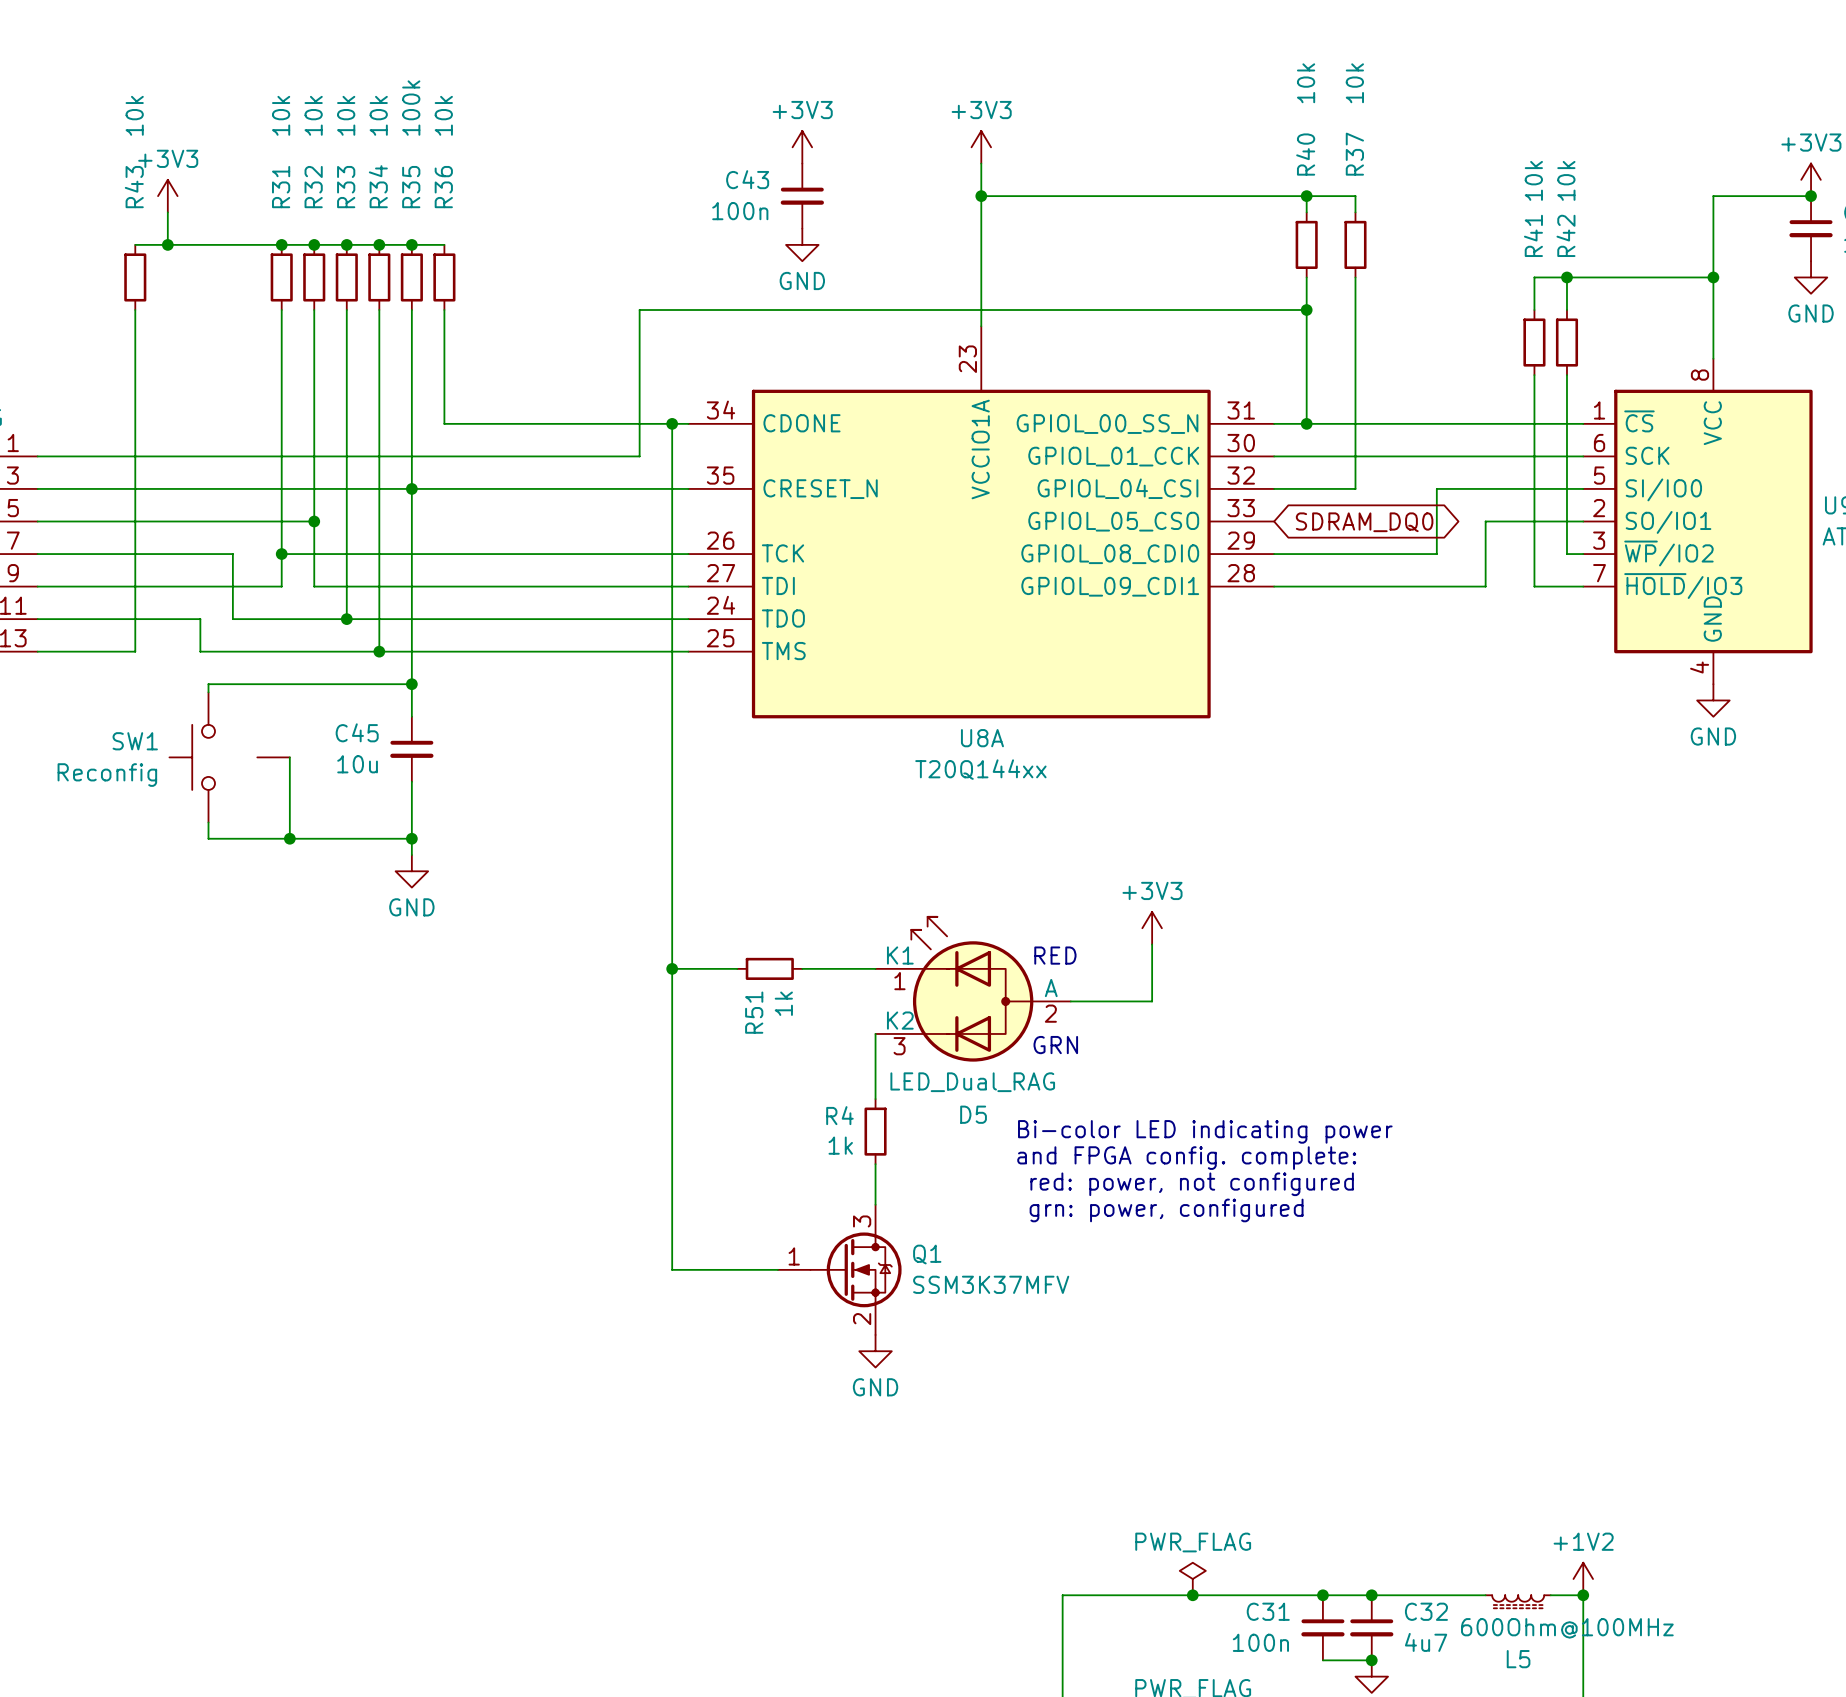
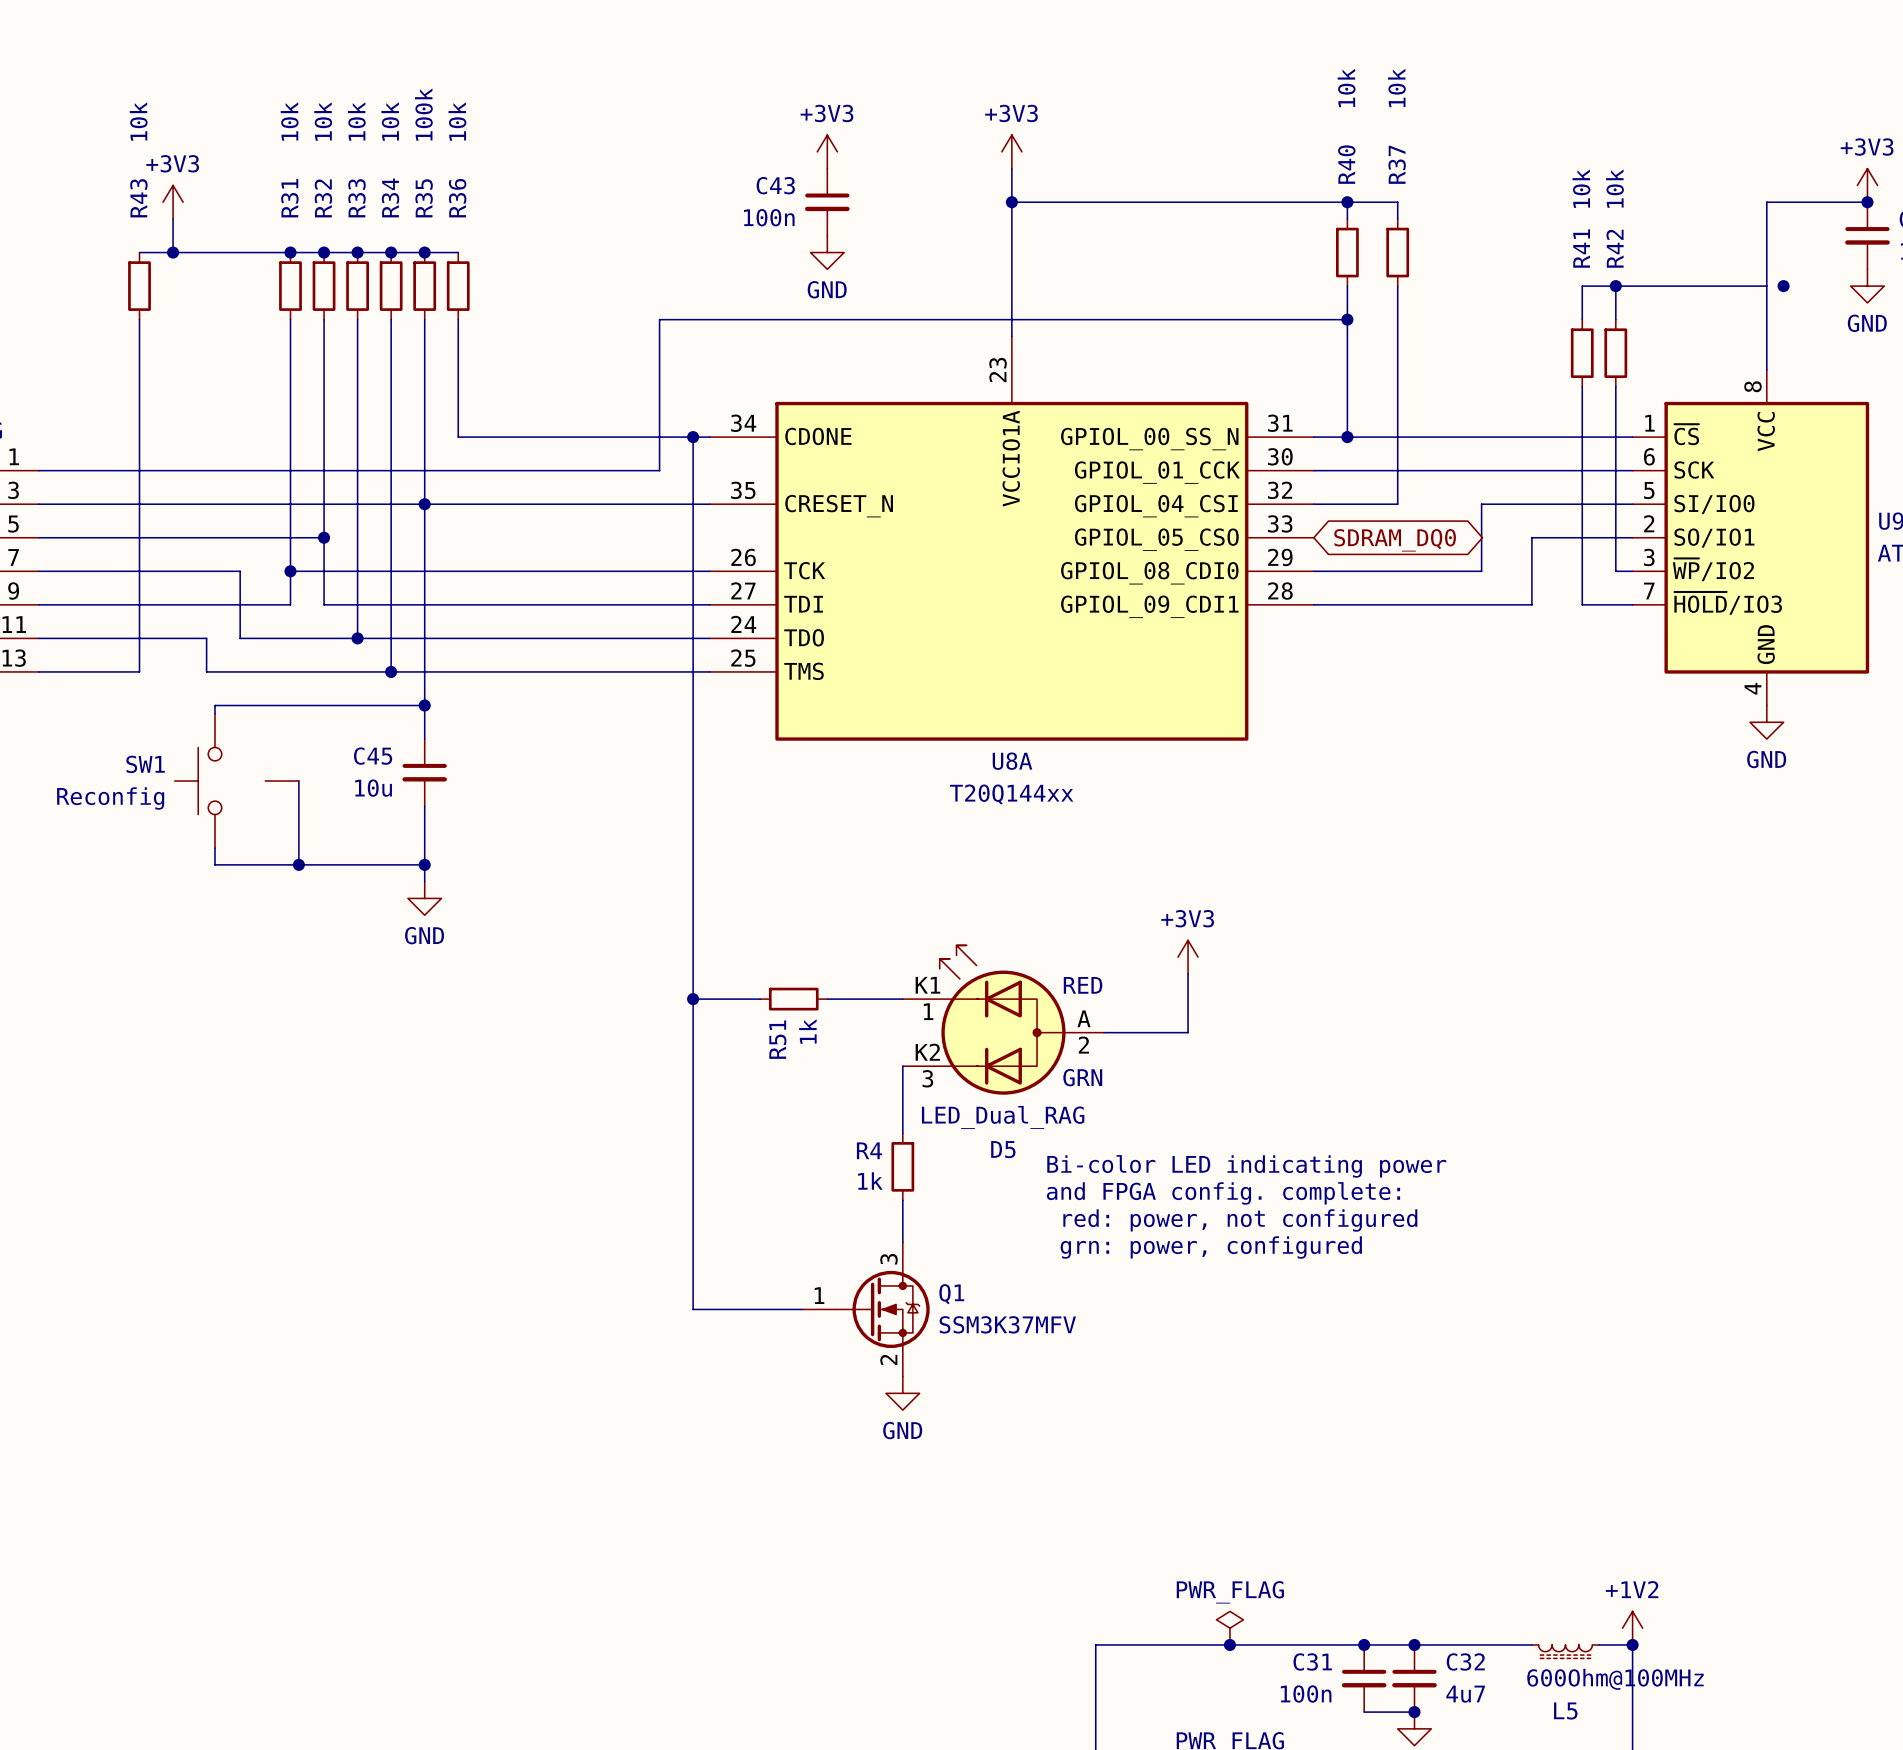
junction position: (1713, 277) -> (1783, 286)

